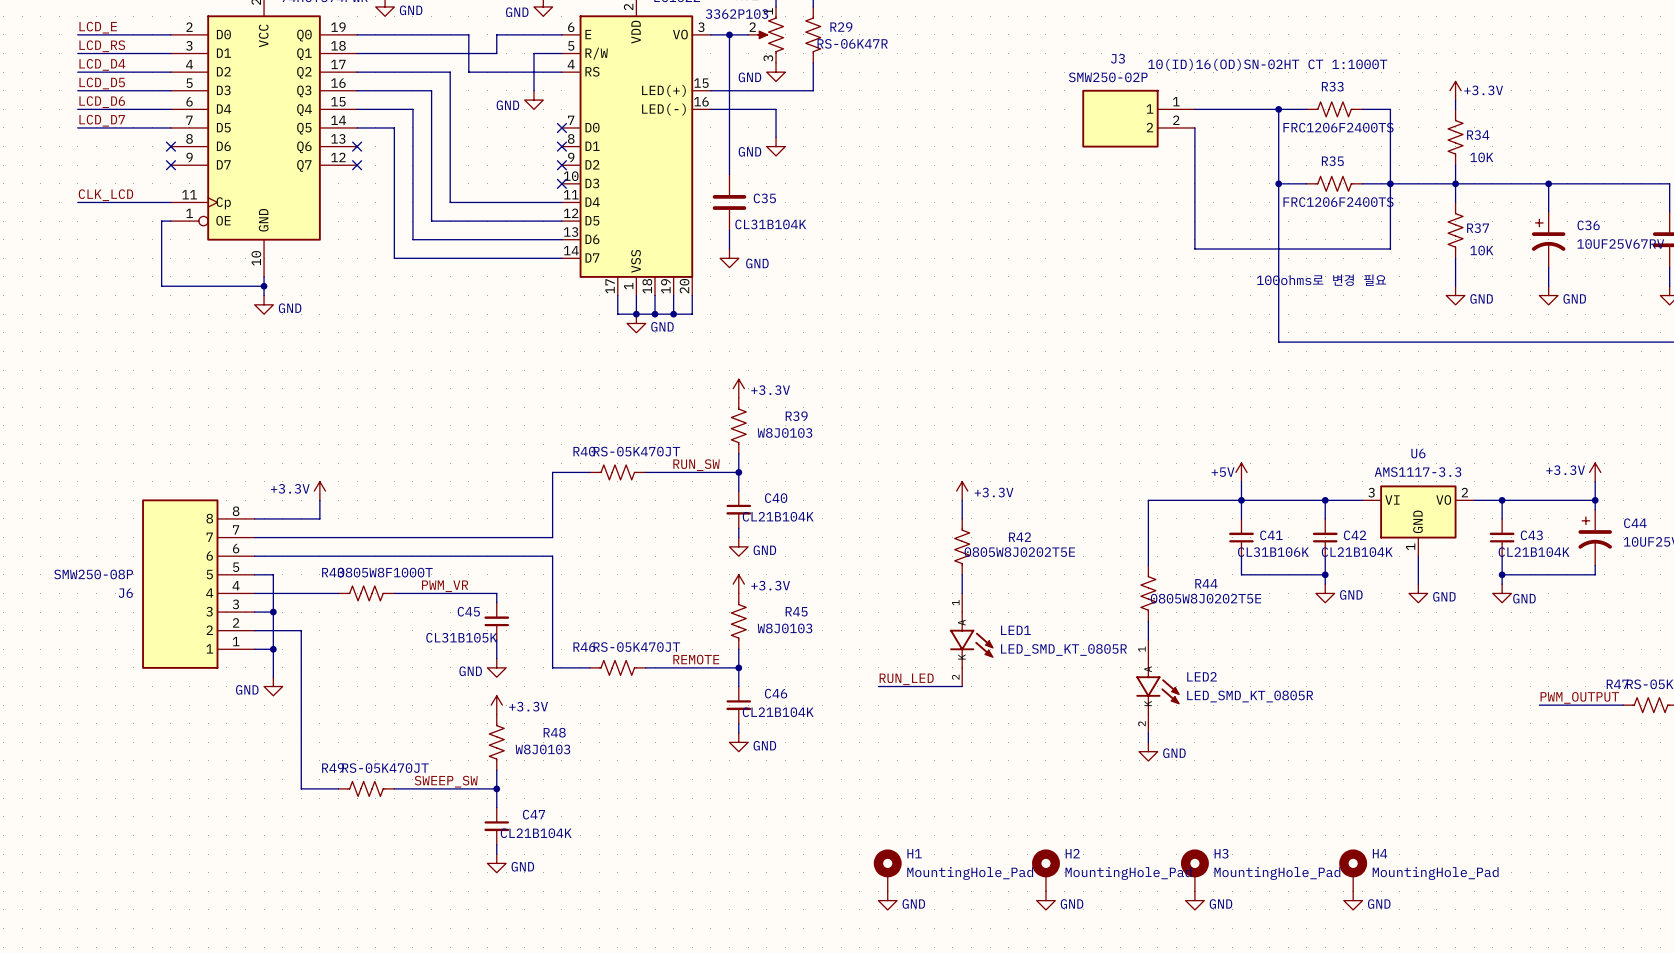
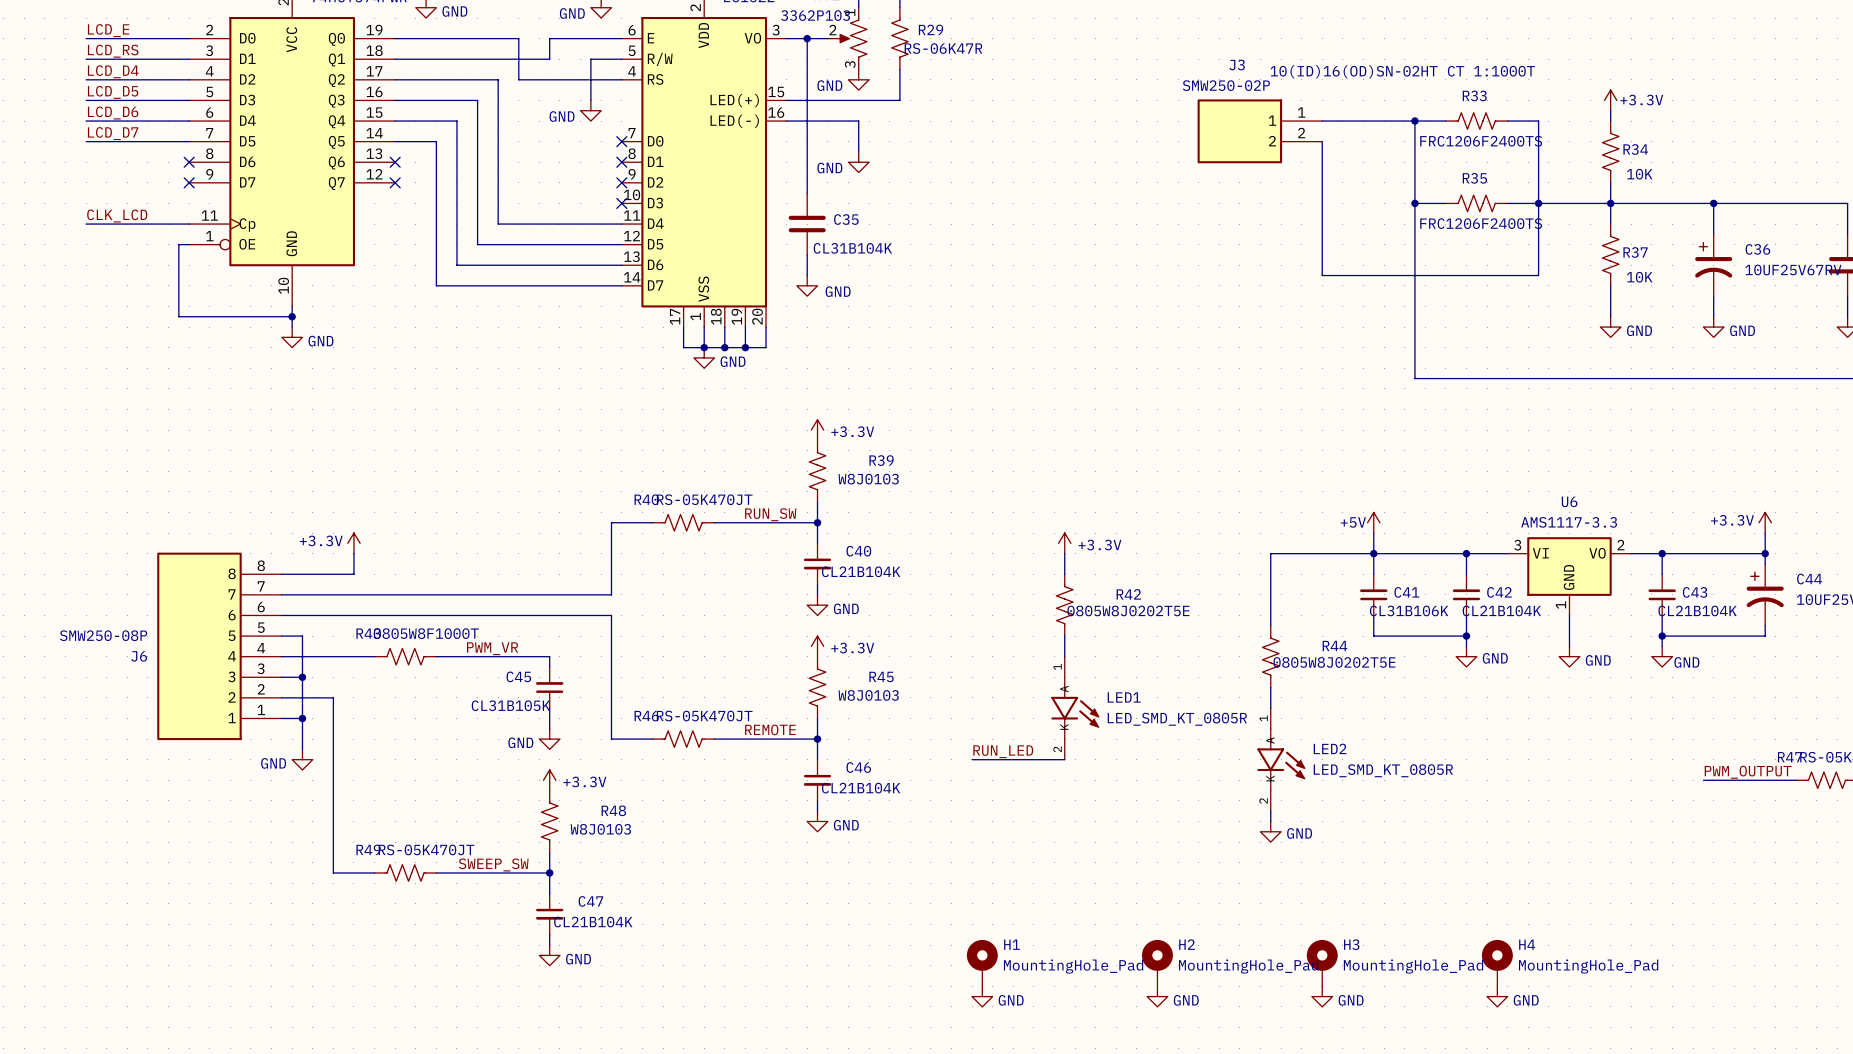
text: 100ohms로 변경 필요 (1321, 280) -> none

